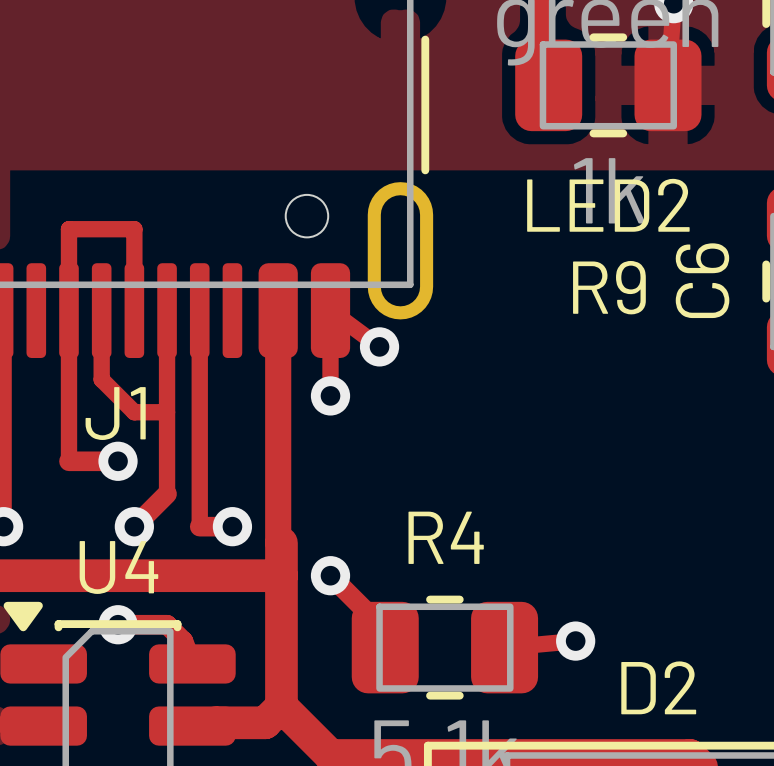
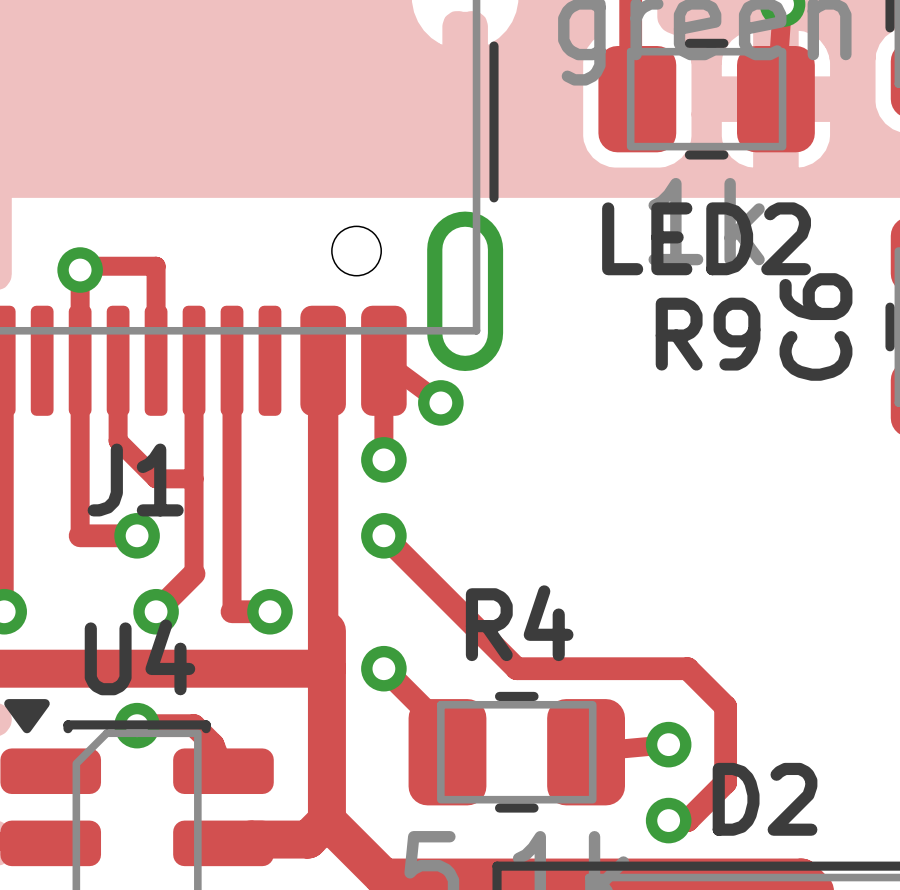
via: none -> (80, 270)
track: none -> (383, 535) (516, 668) (687, 668) (725, 706) (725, 782) (687, 820) (668, 820)
via: none -> (383, 535)
via: none -> (668, 820)

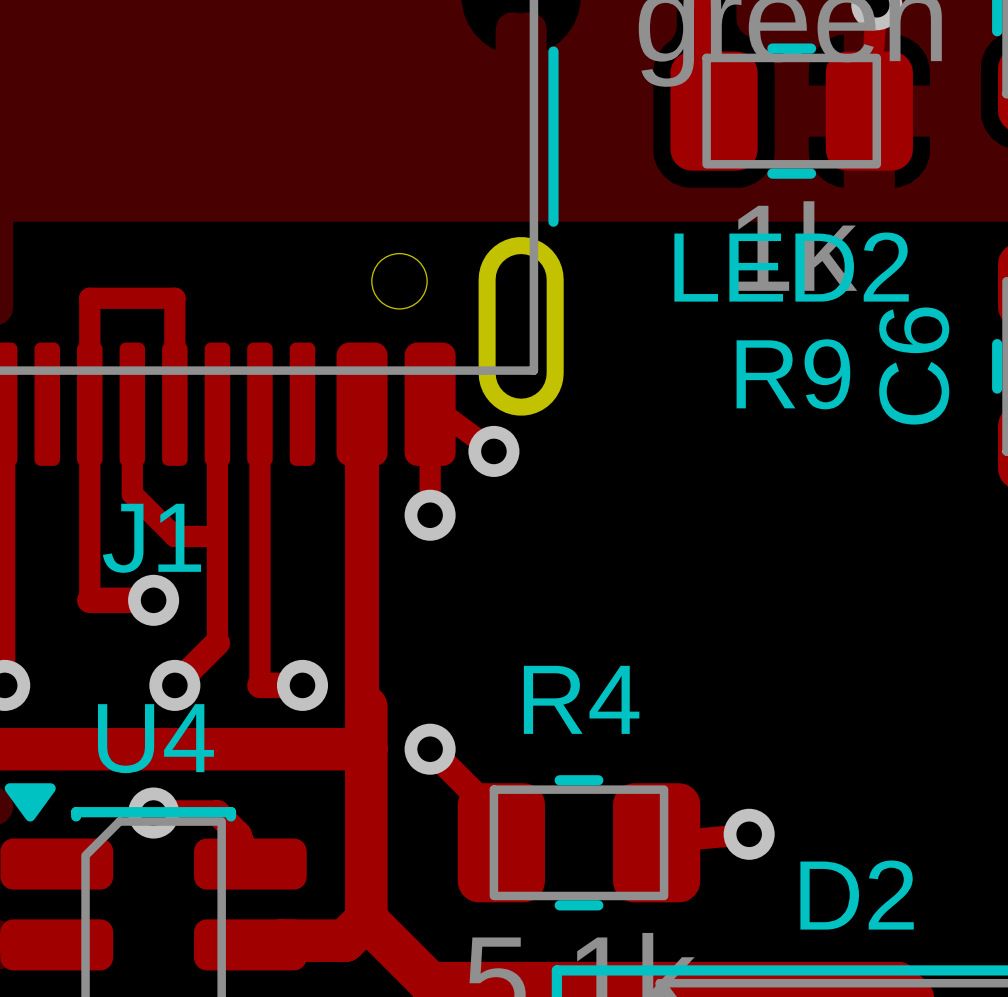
via: (80, 270) -> none
track: (383, 535) (516, 668) (687, 668) (725, 706) (725, 782) (687, 820) (668, 820) -> none
via: (383, 535) -> none
via: (668, 820) -> none

